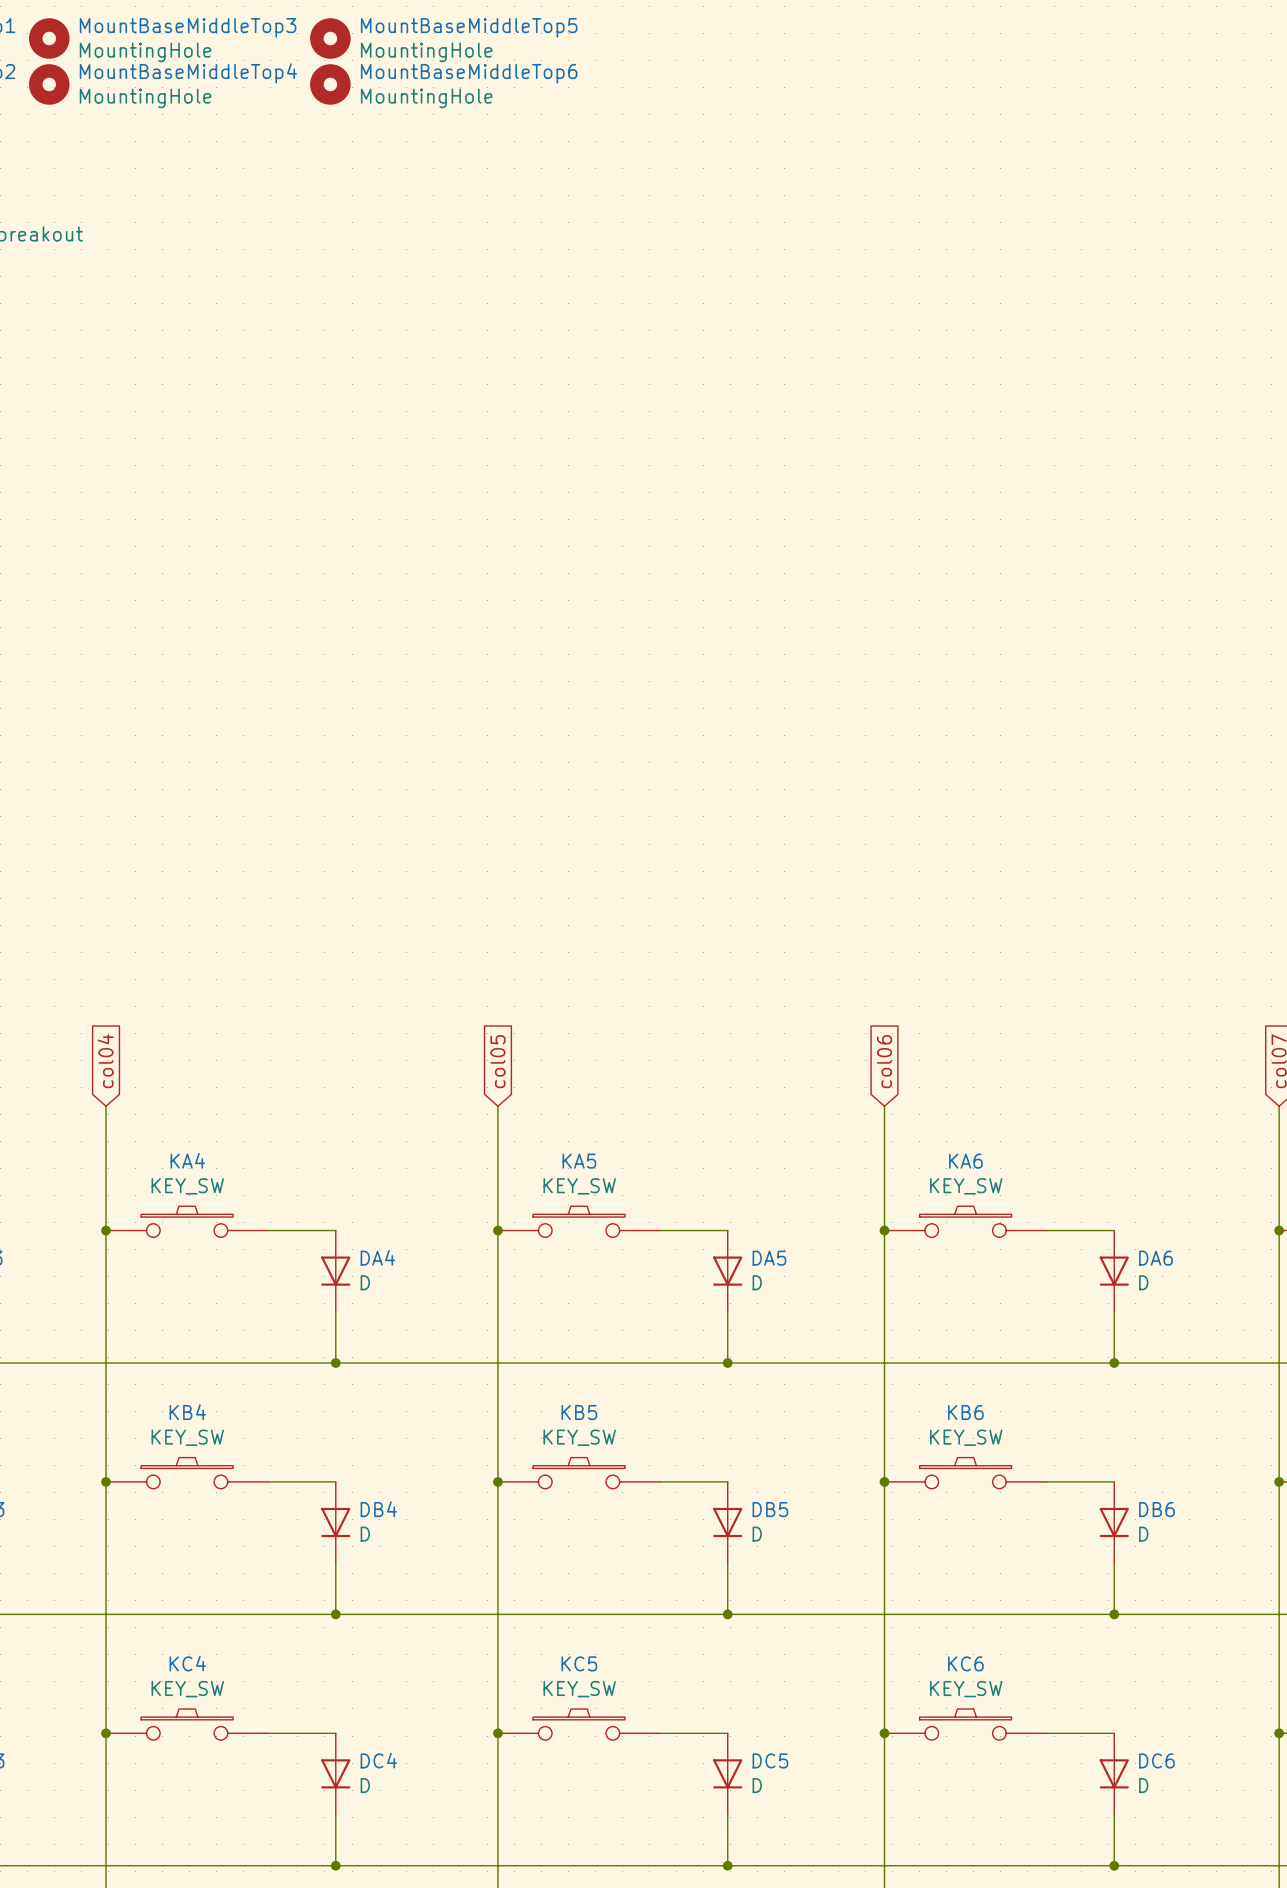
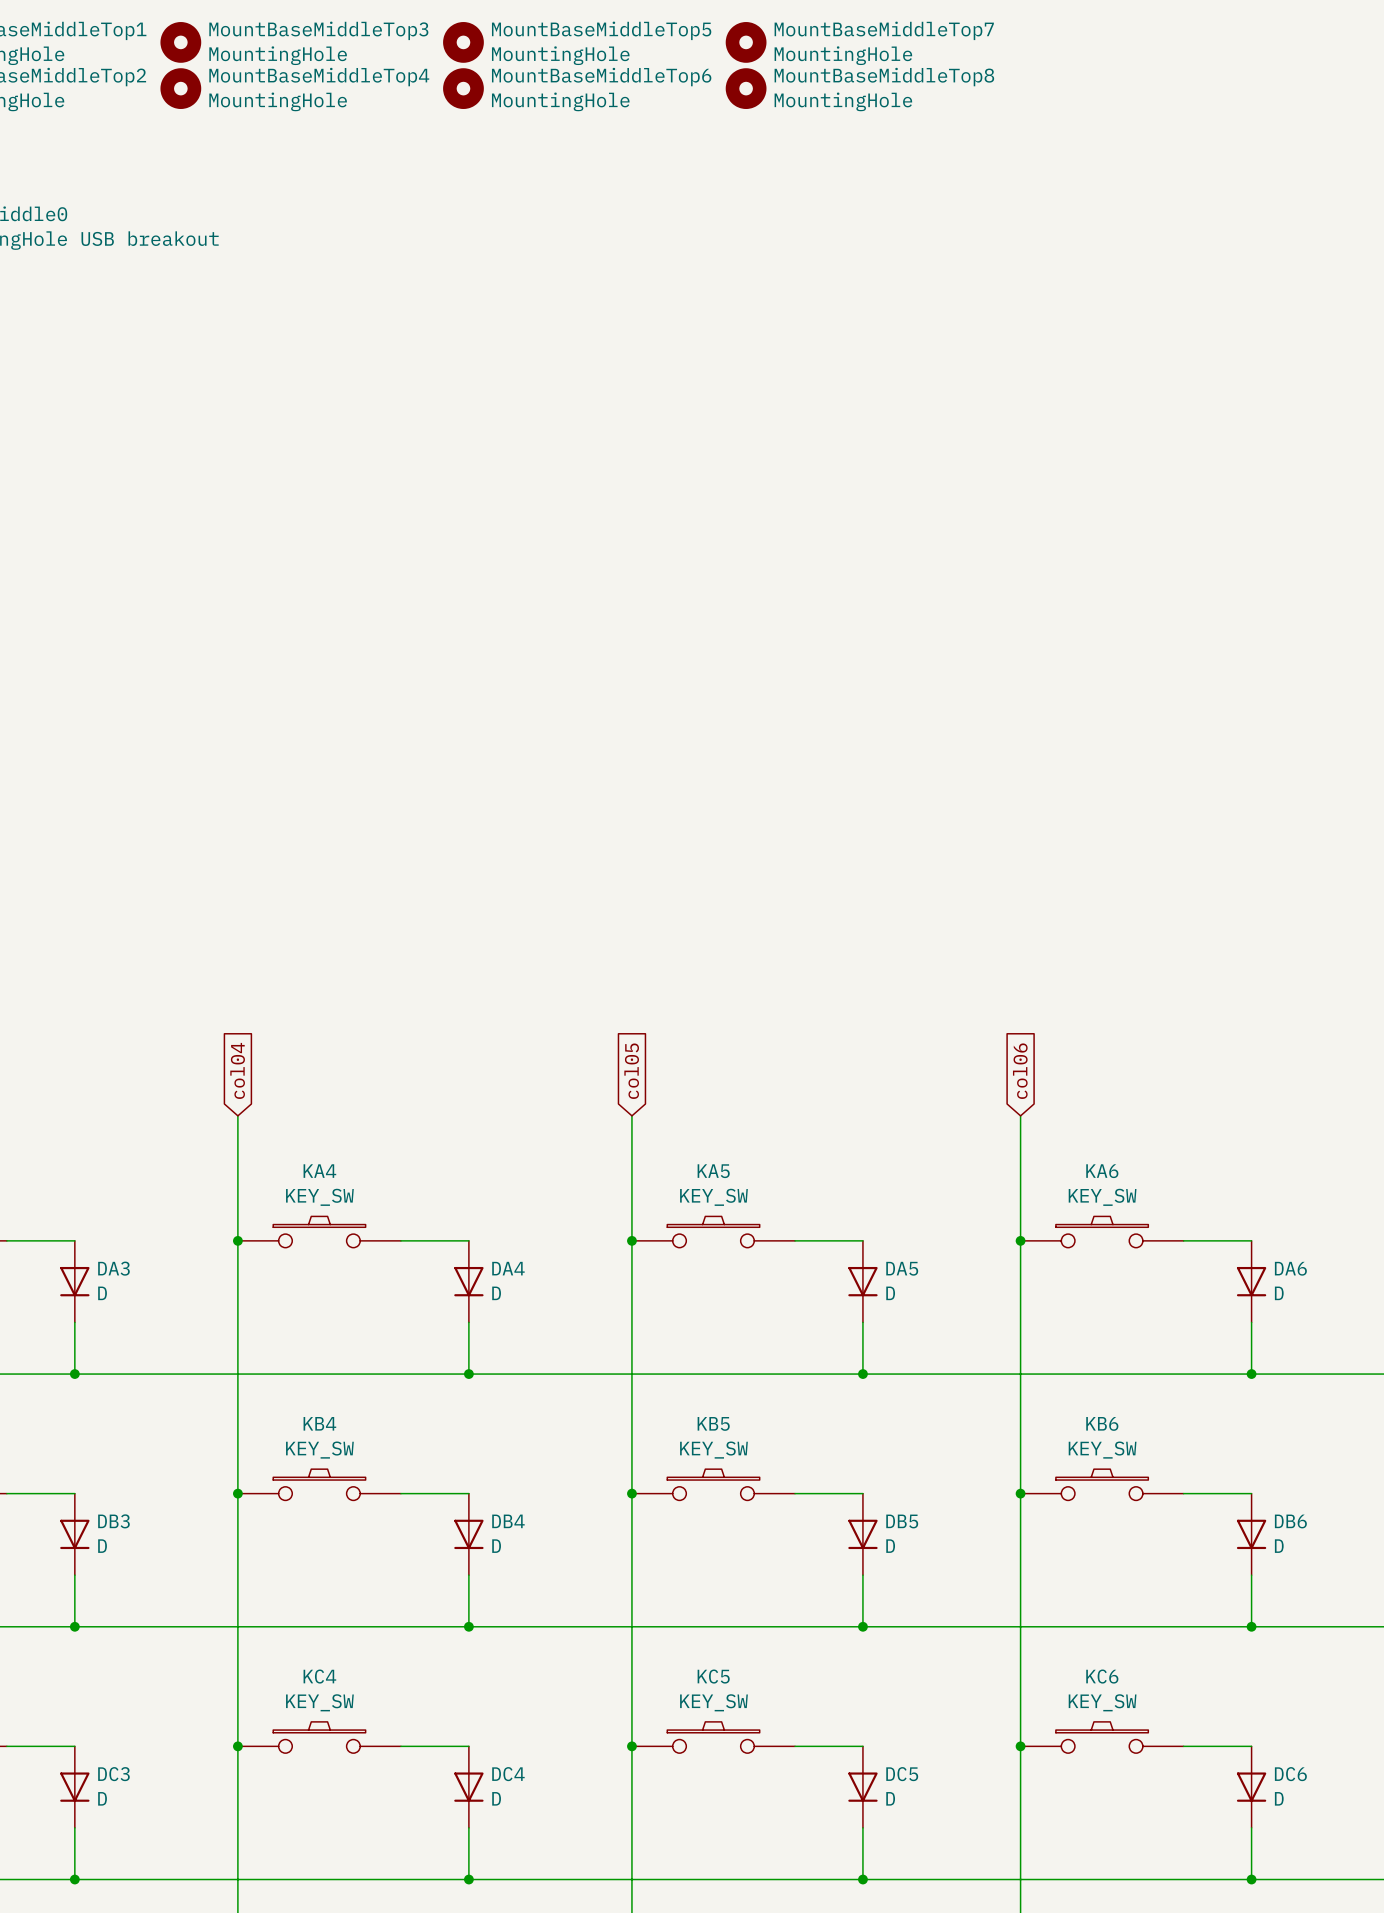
MountBaseMiddleTop7: none -> MountingHole (746, 42)
MountBaseMiddleTop8: none -> MountingHole (746, 88)

